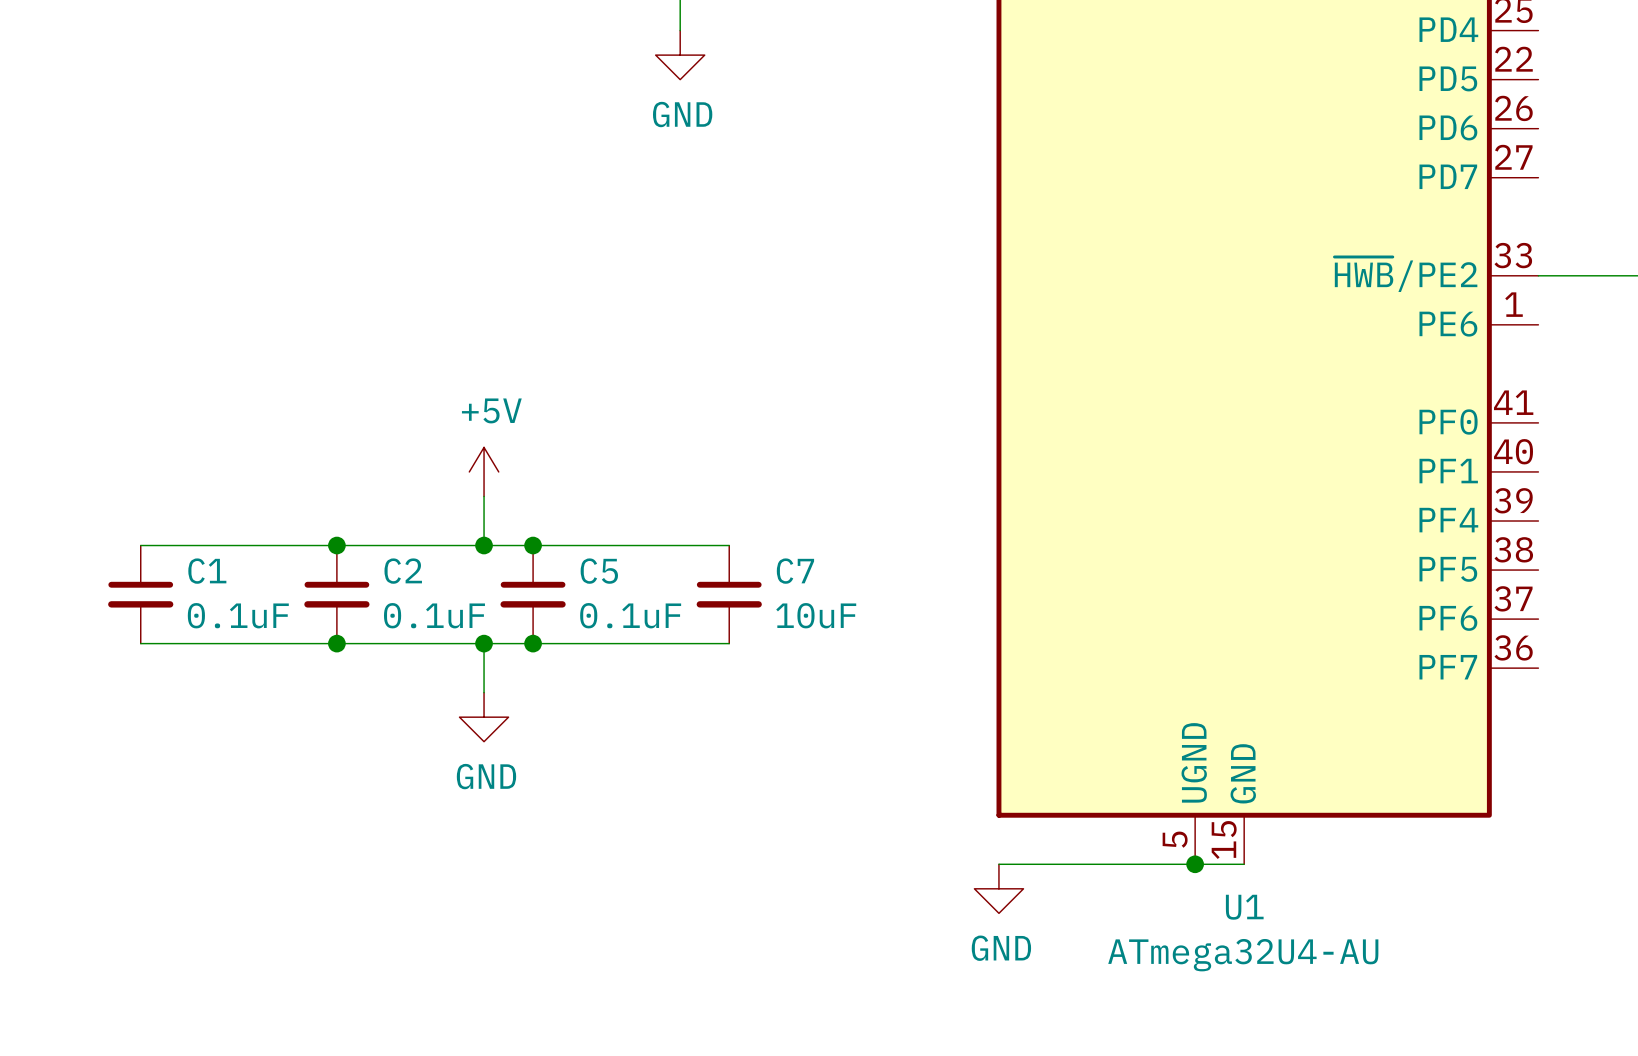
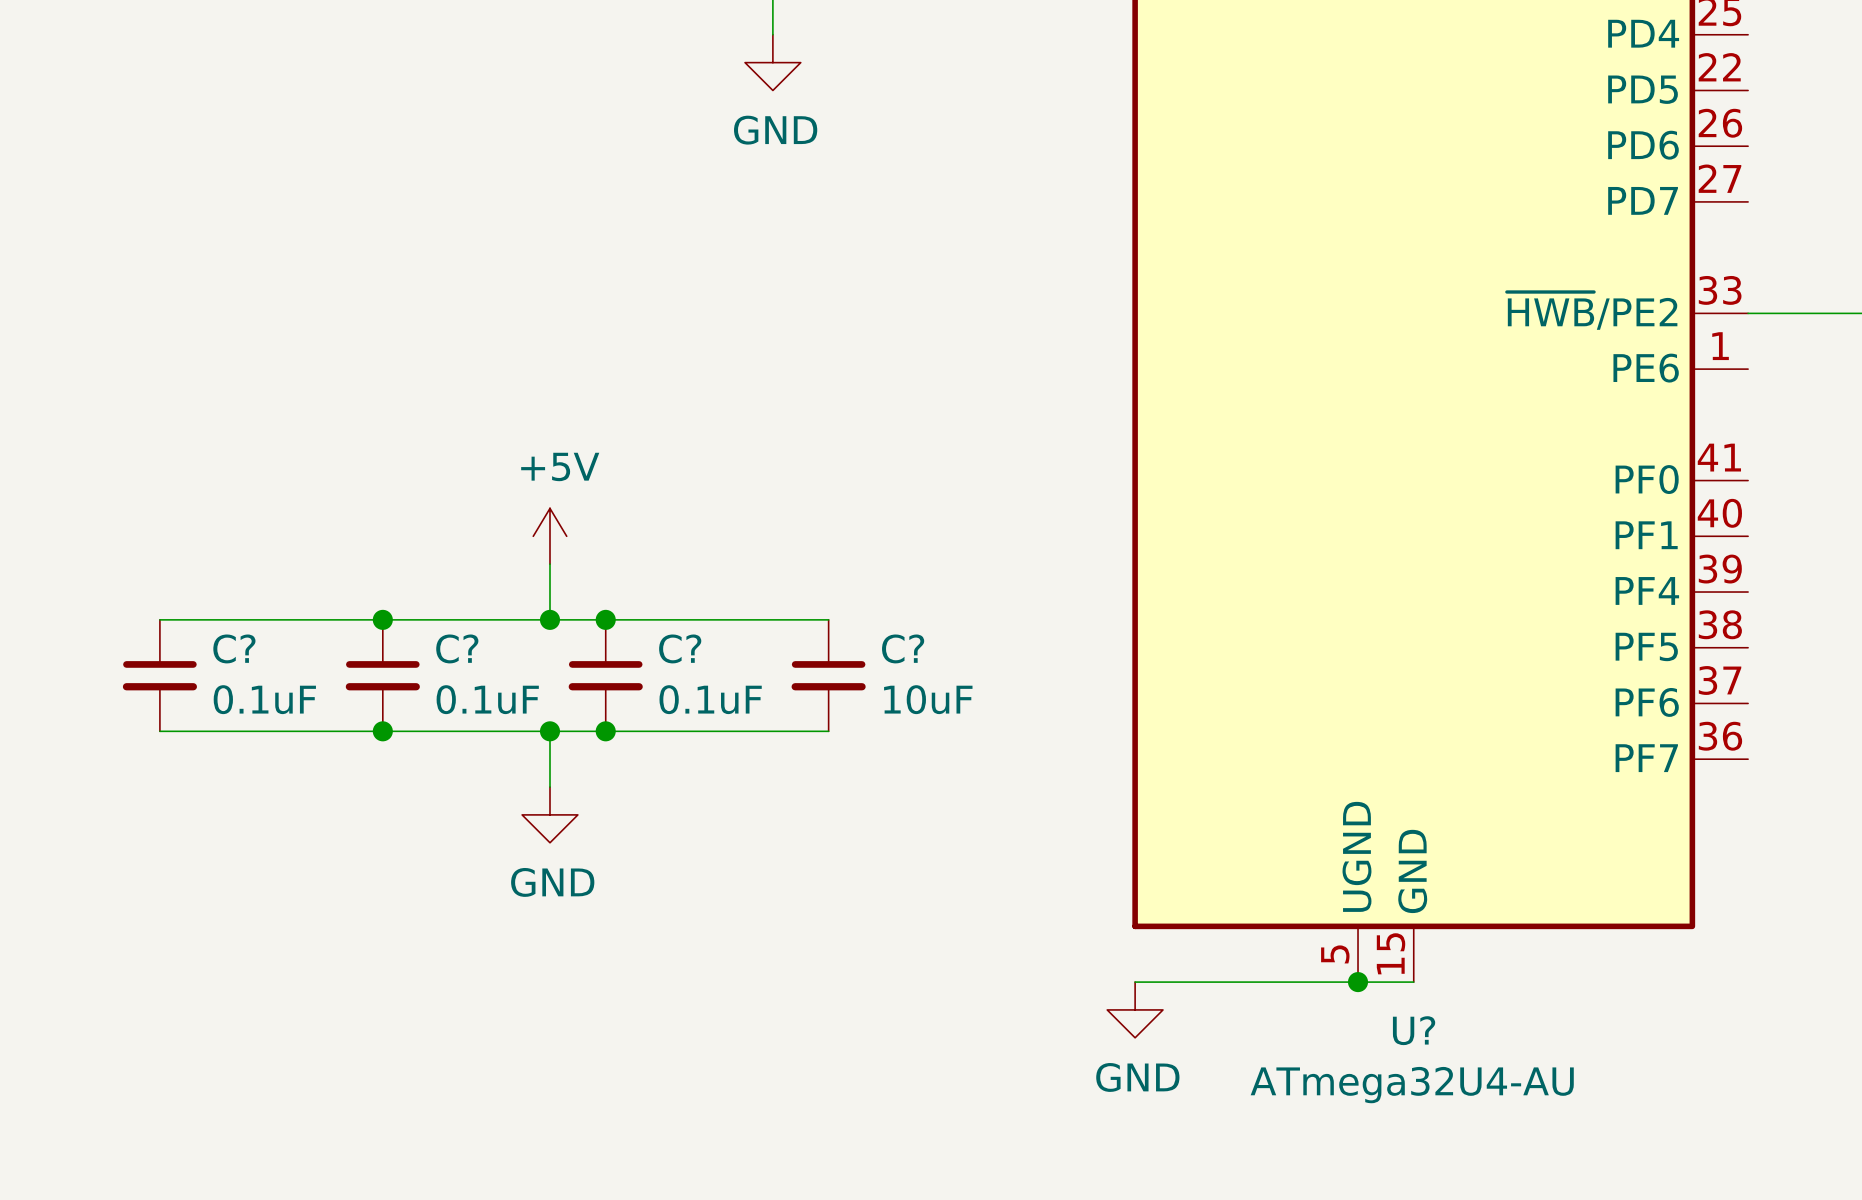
C1 name: C1 (207, 571) -> C? (234, 648)
C2 name: C2 (403, 571) -> C? (457, 648)
C5 name: C5 (599, 571) -> C? (680, 648)
C7 name: C7 (795, 571) -> C? (903, 648)
U1 name: U1 (1244, 907) -> U? (1414, 1030)

